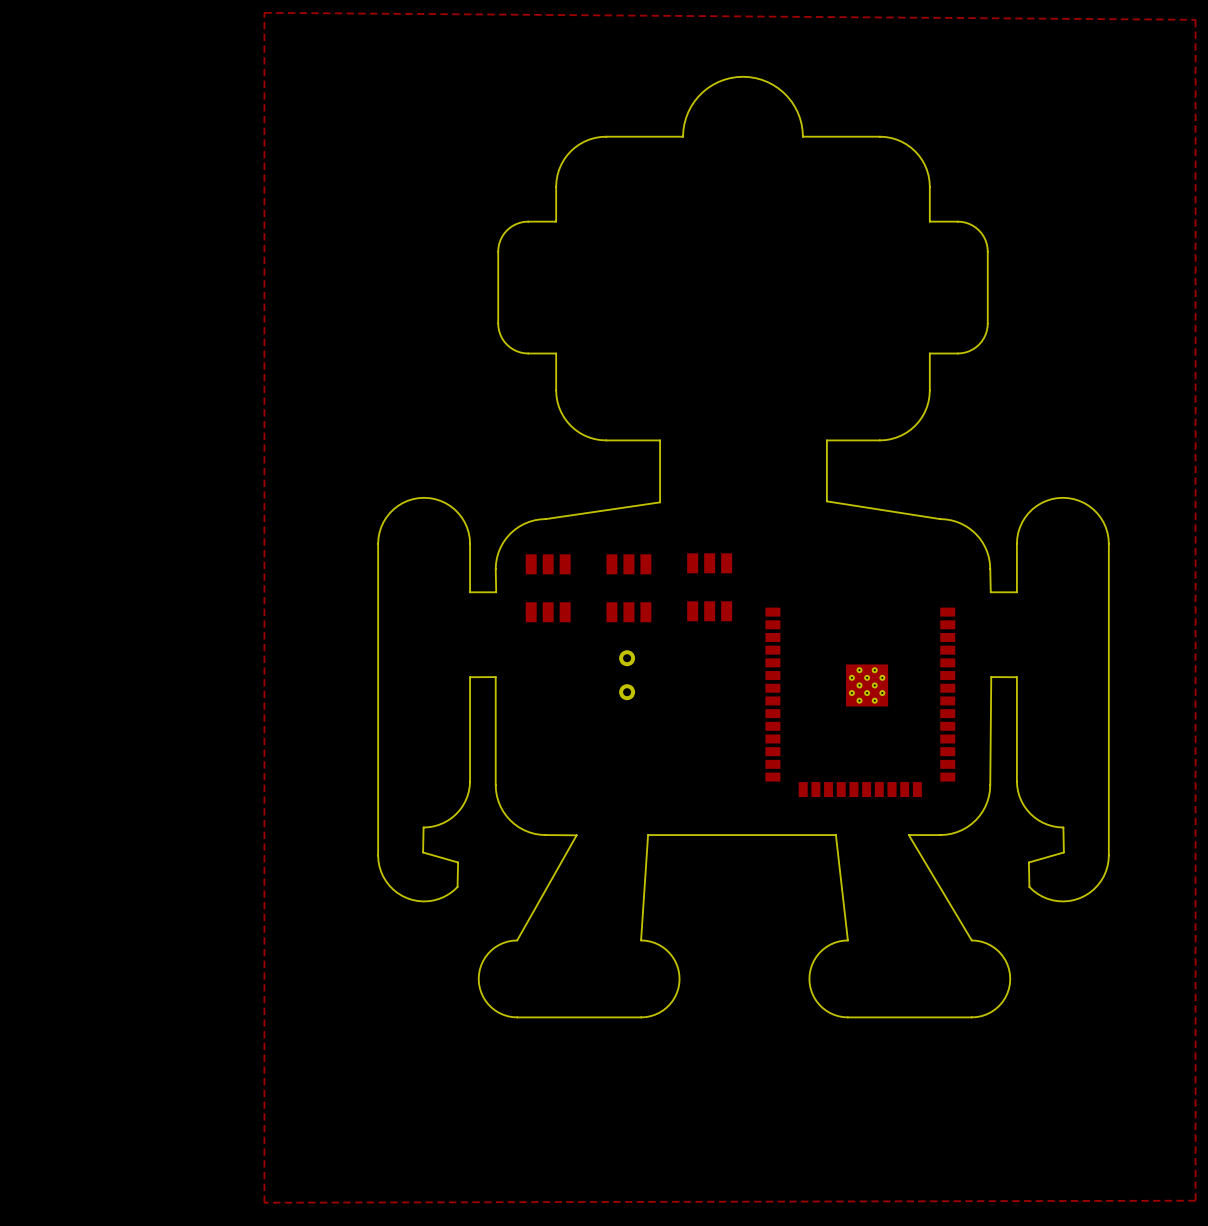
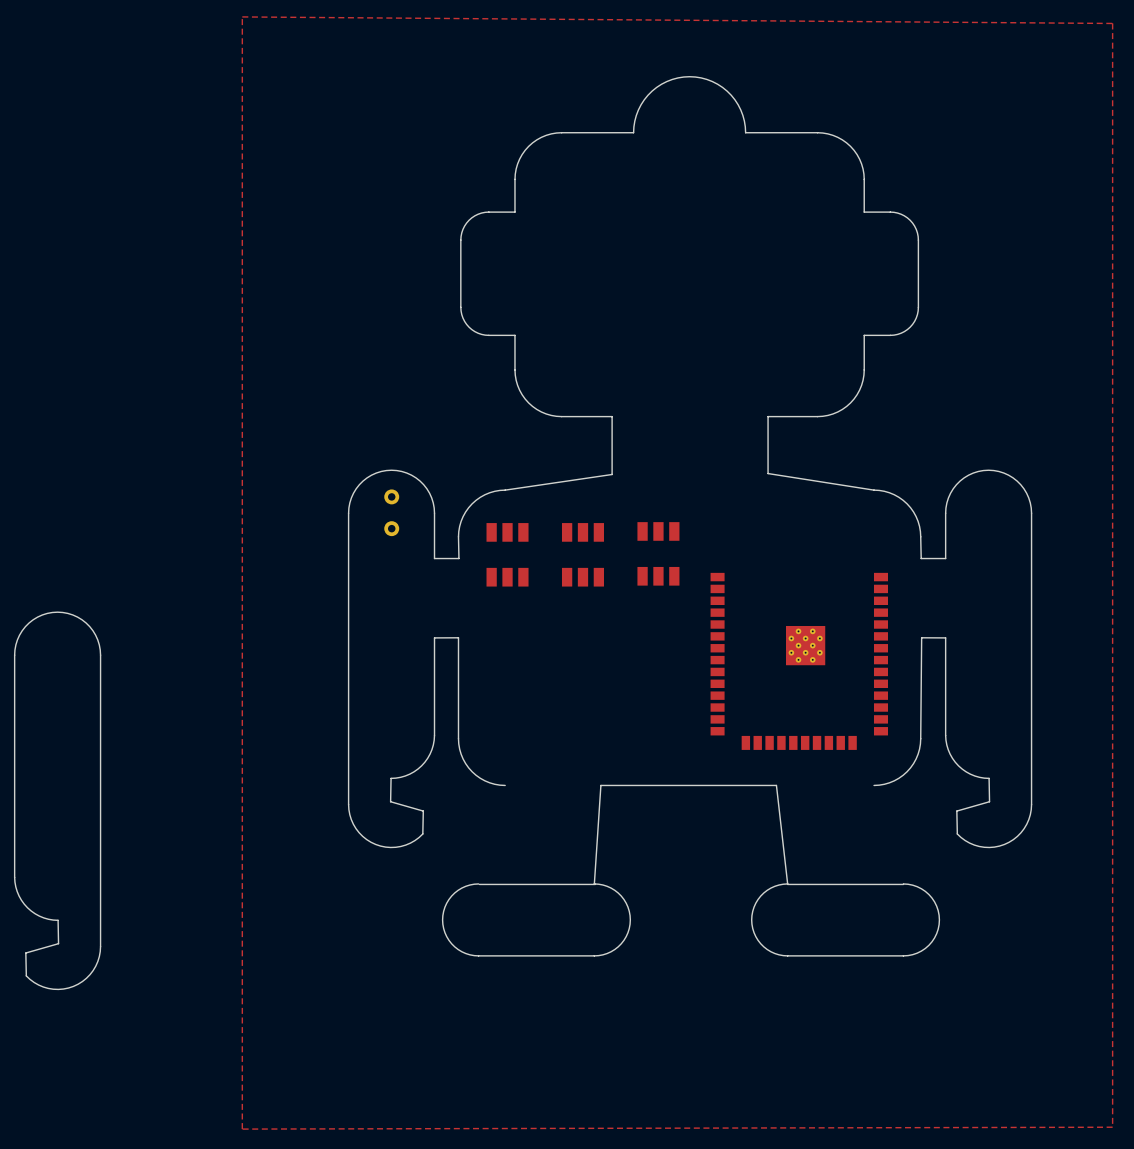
part position: (627, 675) -> (391, 512)
board edge: none -> (100, 655) (100, 951) (95, 966) (86, 978) (73, 986) (53, 989) (38, 985) (26, 975) (25, 953) (58, 943) (58, 920) (39, 916) (27, 907) (19, 896) (14, 882) (14, 649) (19, 635) (29, 622) (47, 613) (62, 612) (77, 617) (89, 626) (97, 639) (100, 655)
board edge: (545, 835) (576, 835) (517, 940) -> none
board edge: (940, 835) (908, 835) (971, 940) -> none
board edge: none -> (595, 884) (479, 884)
board edge: none -> (903, 884) (787, 884)

